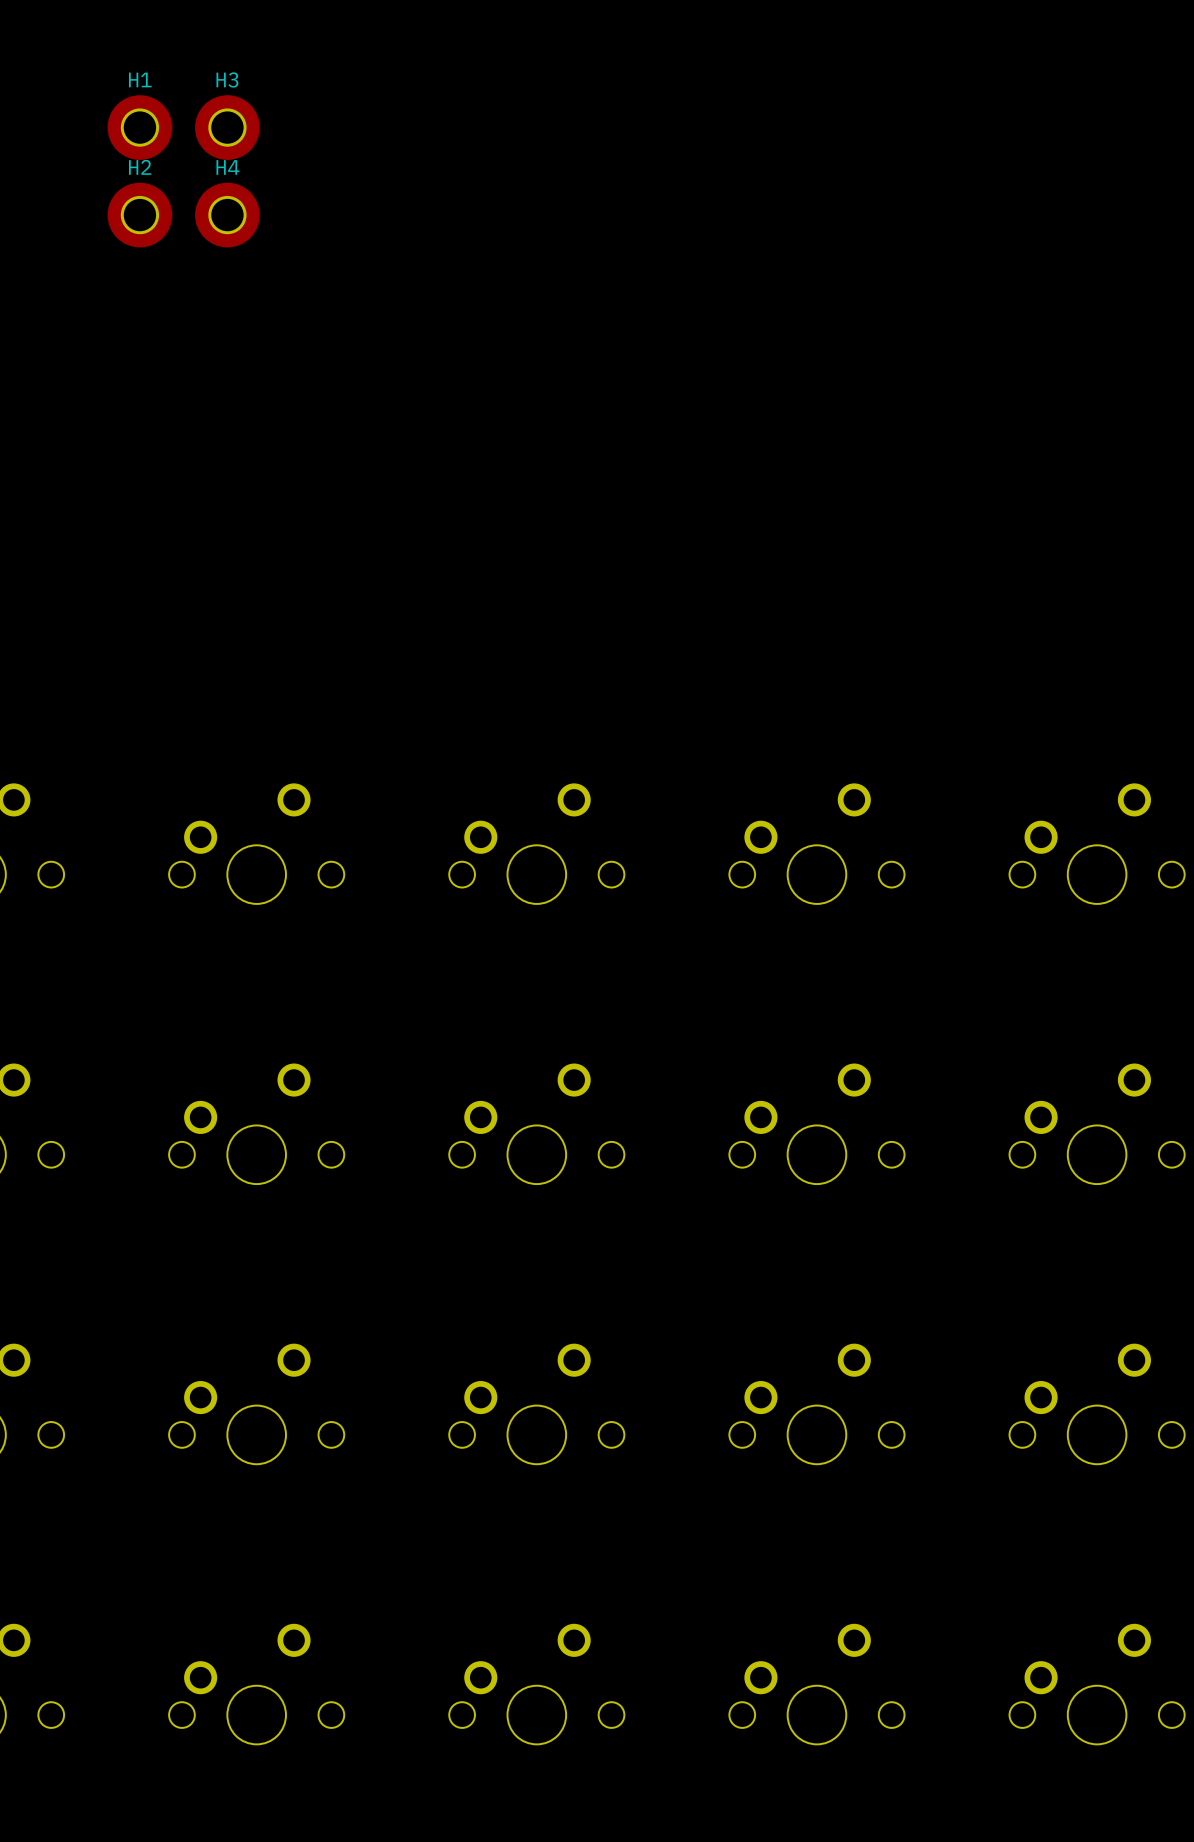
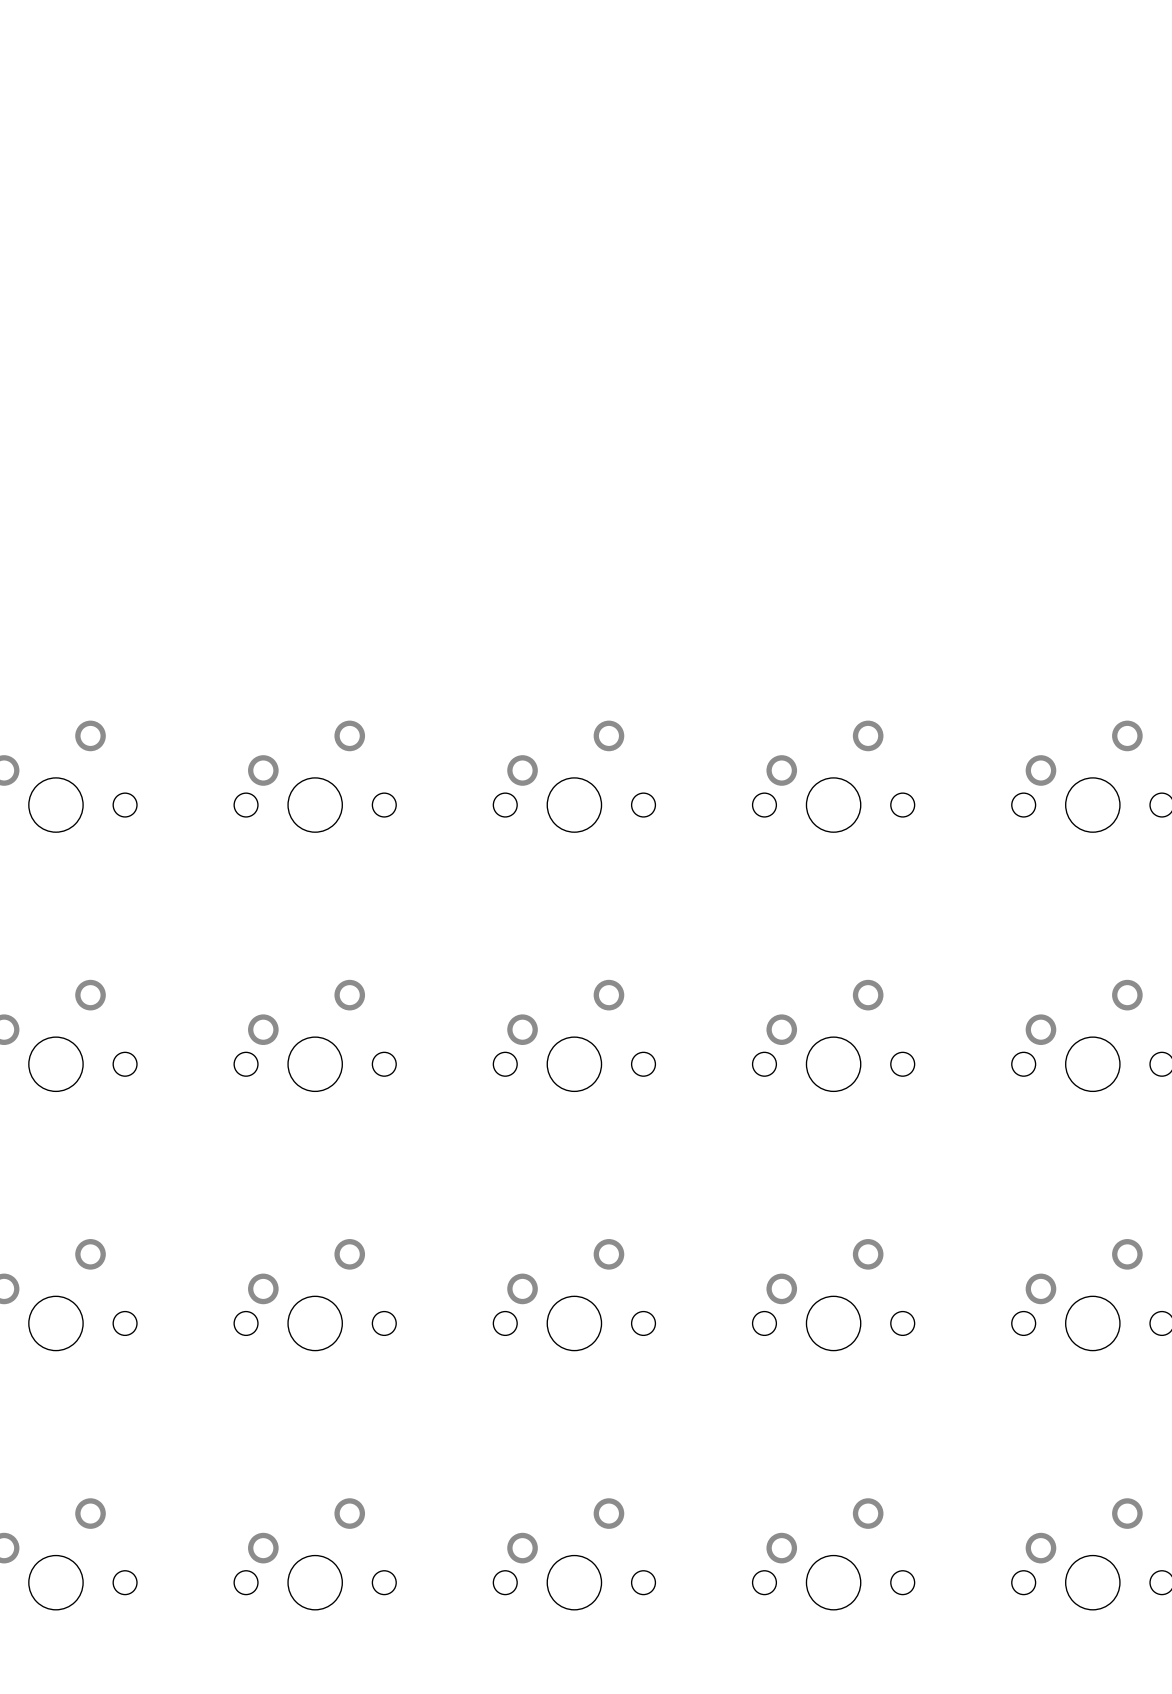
H1: (139, 127) -> none
H3: (227, 127) -> none
H2: (139, 215) -> none
H4: (227, 215) -> none

